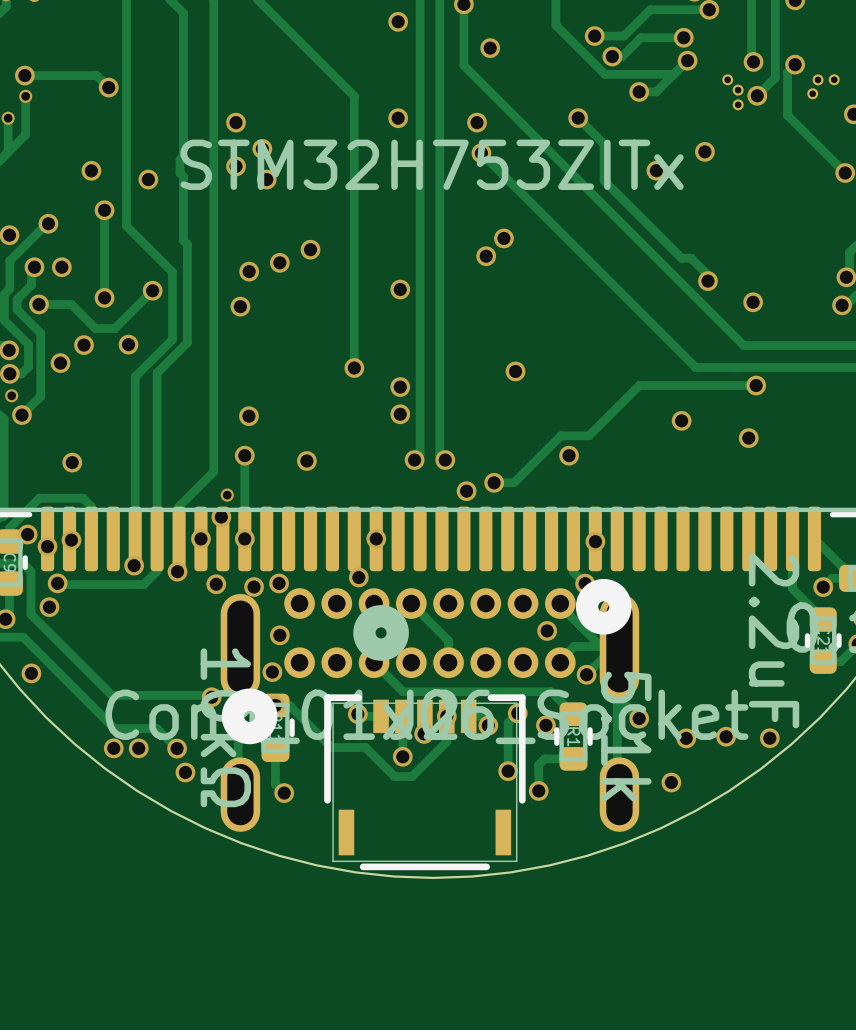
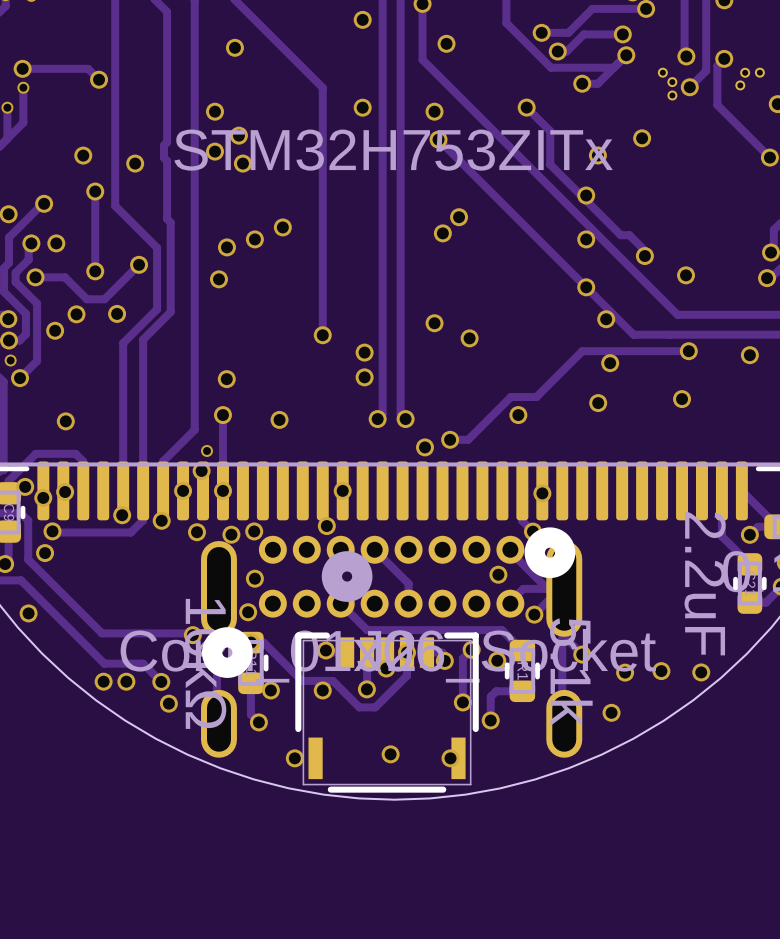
via: none -> (234, 47)
via: none -> (586, 195)
via: none -> (586, 239)
via position: (400, 289) -> (434, 323)
via: none -> (586, 287)
via: none -> (606, 319)
via: none -> (749, 355)
via: none -> (610, 363)
via: (681, 420) -> none
via: none -> (598, 403)
via: none -> (270, 690)
via: none -> (322, 690)
via: none -> (390, 754)
via: none -> (294, 758)
via: none -> (450, 758)

